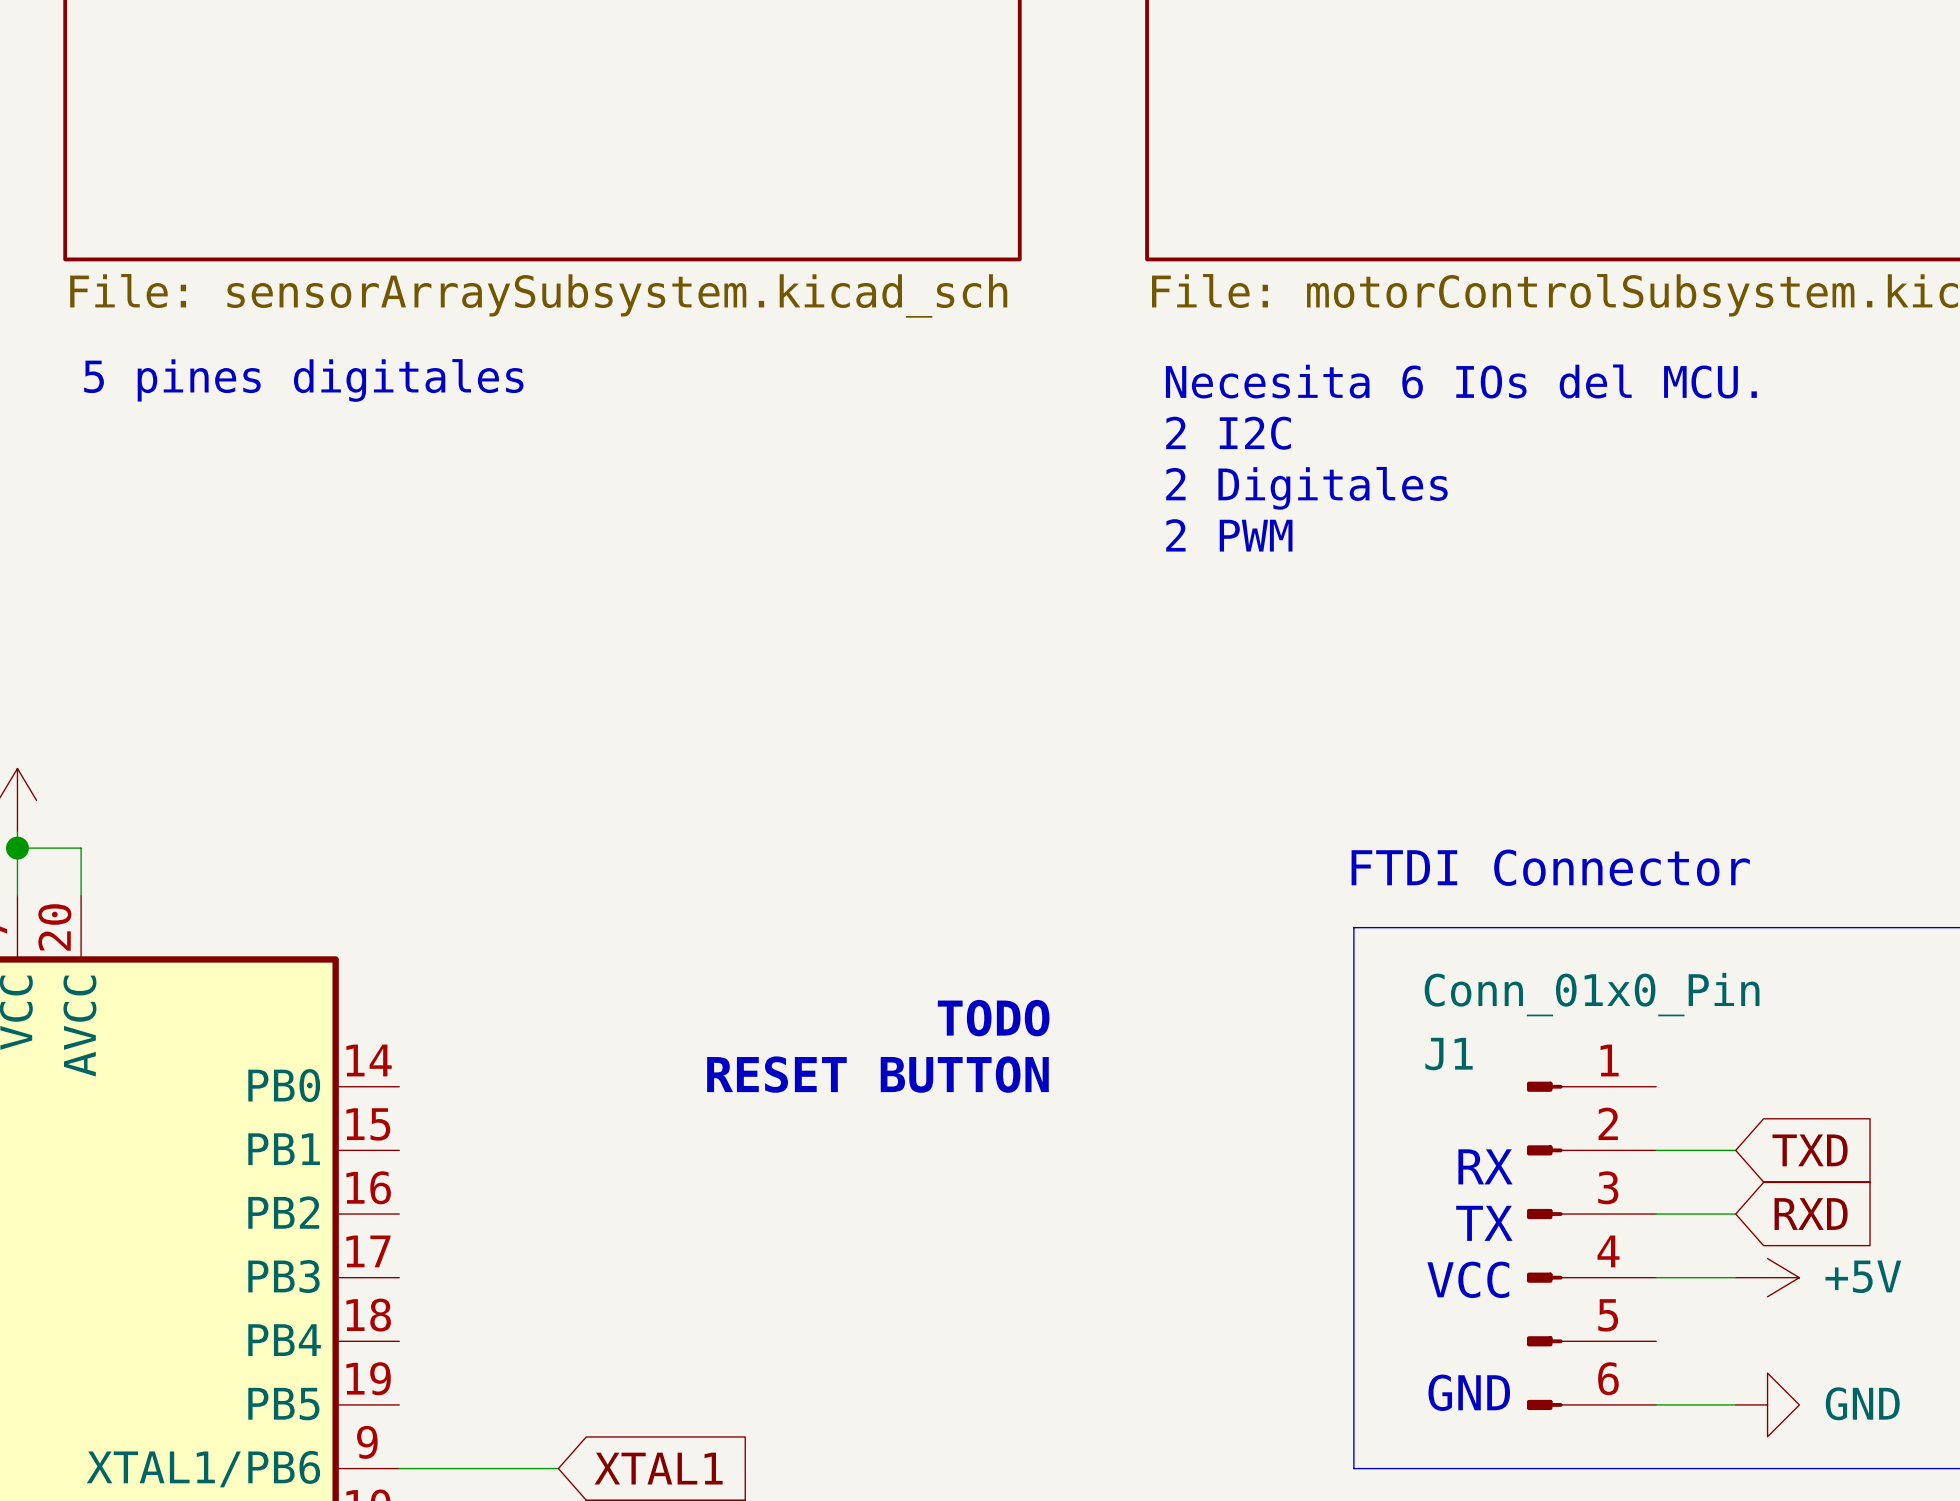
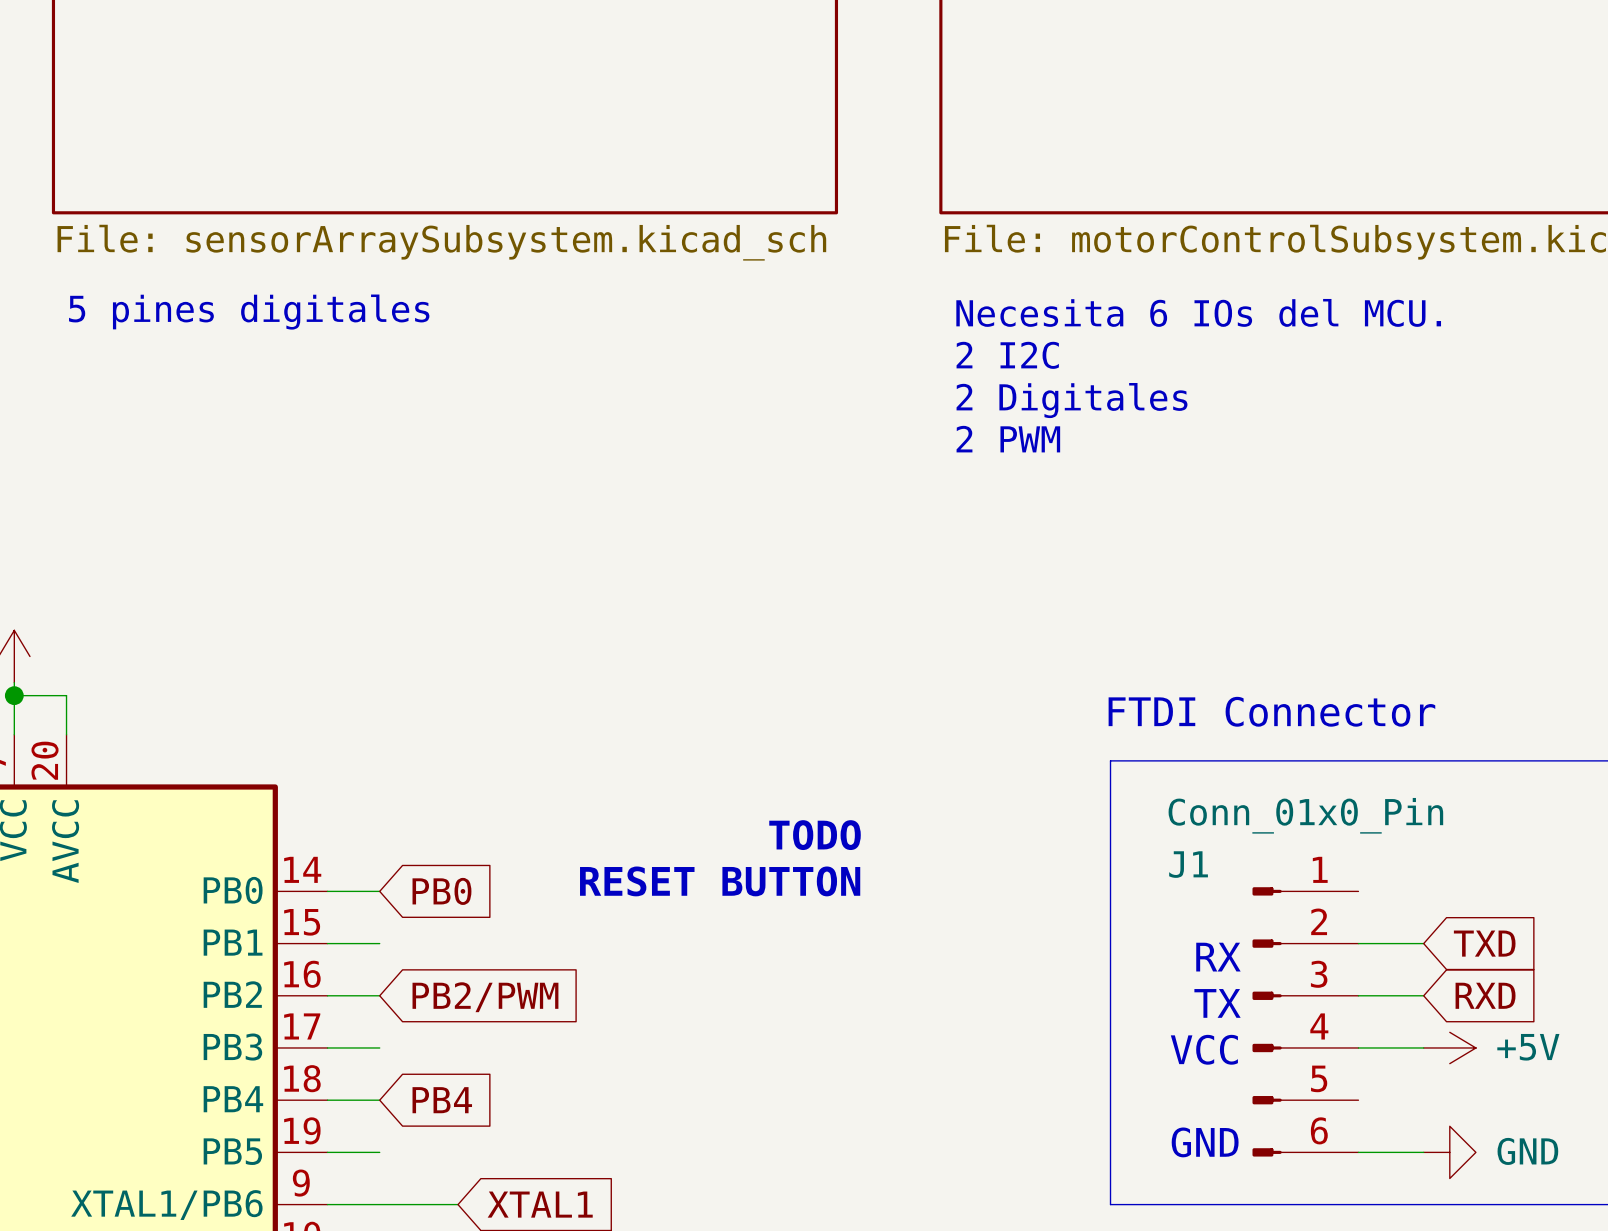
wire: none -> (327, 891) (379, 891)
global label: none -> PB0 (441, 891)
wire: none -> (327, 943) (379, 943)
wire: none -> (327, 995) (379, 995)
global label: none -> PB2/PWM (485, 997)
wire: none -> (327, 1047) (379, 1047)
wire: none -> (327, 1100) (379, 1100)
global label: none -> PB4 (442, 1100)
wire: none -> (327, 1152) (379, 1152)

